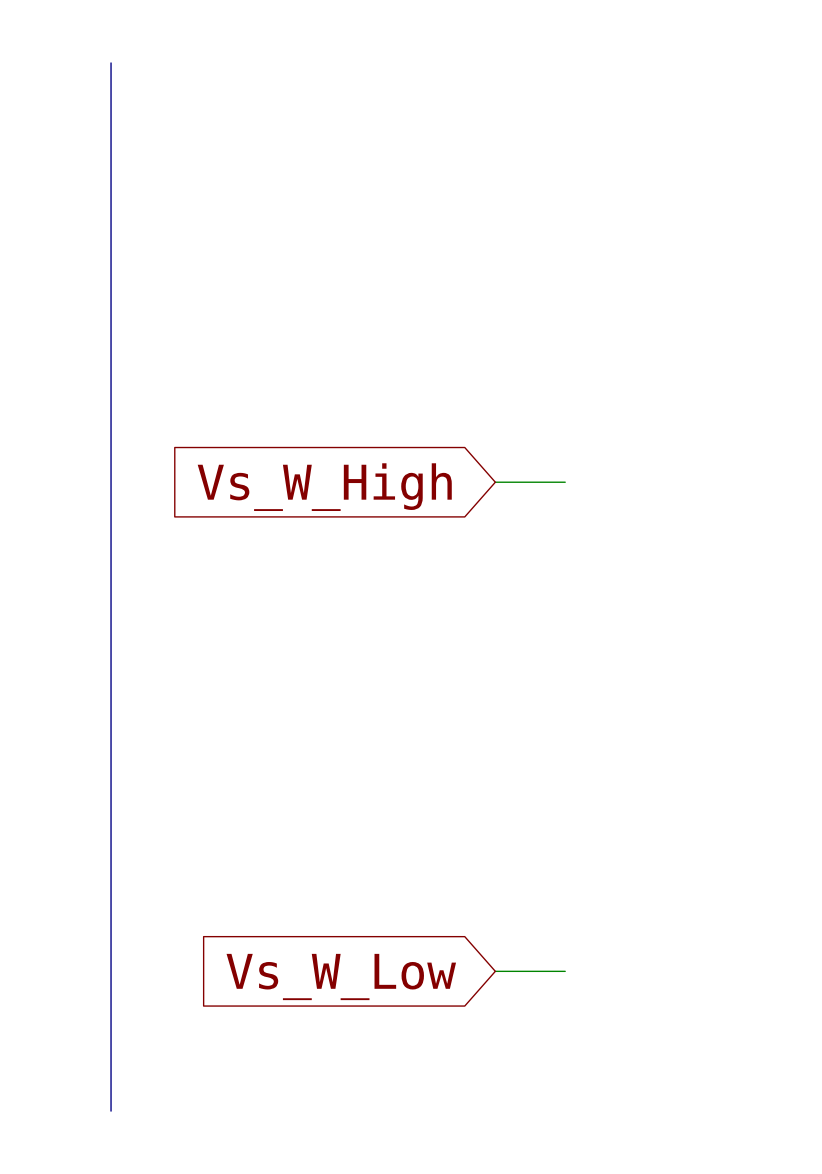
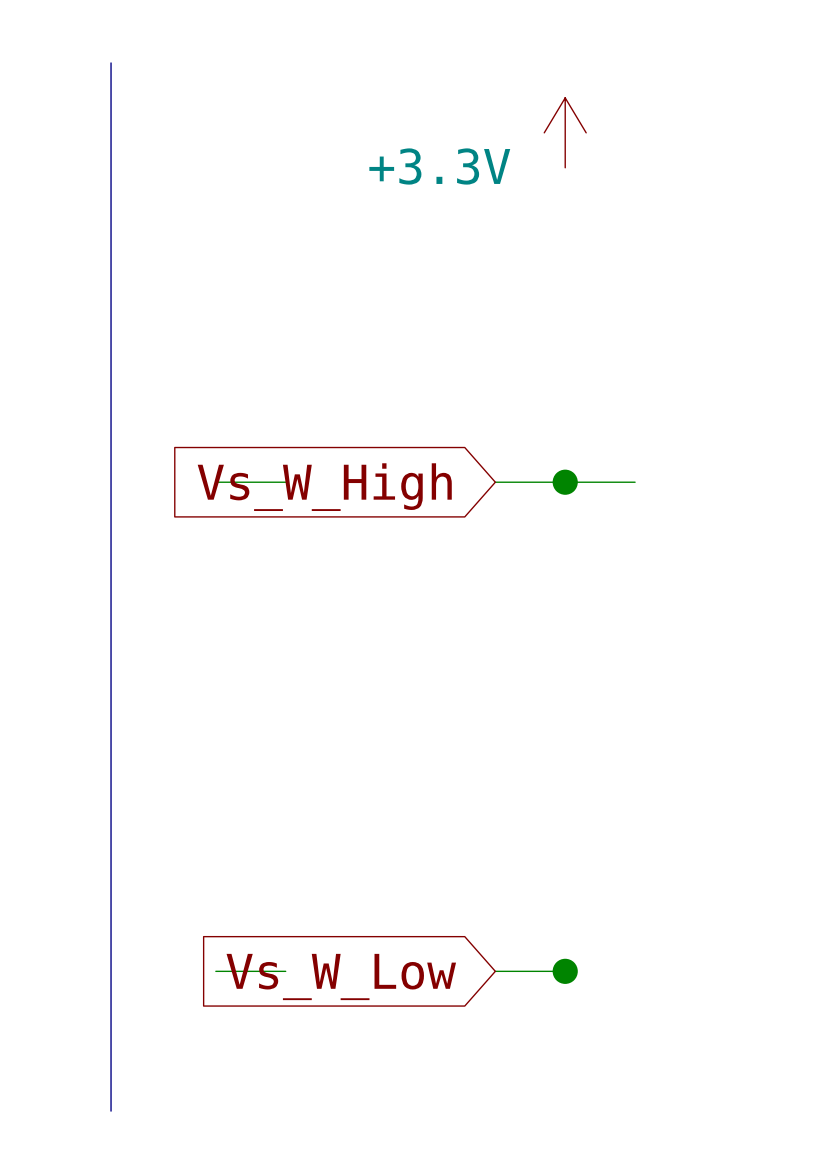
power symbol: none -> +3.3V (565, 132)
wire: none -> (215, 482) (285, 482)
wire: none -> (565, 482) (635, 482)
junction: none -> (565, 482)
wire: none -> (215, 971) (285, 971)
junction: none -> (565, 971)

